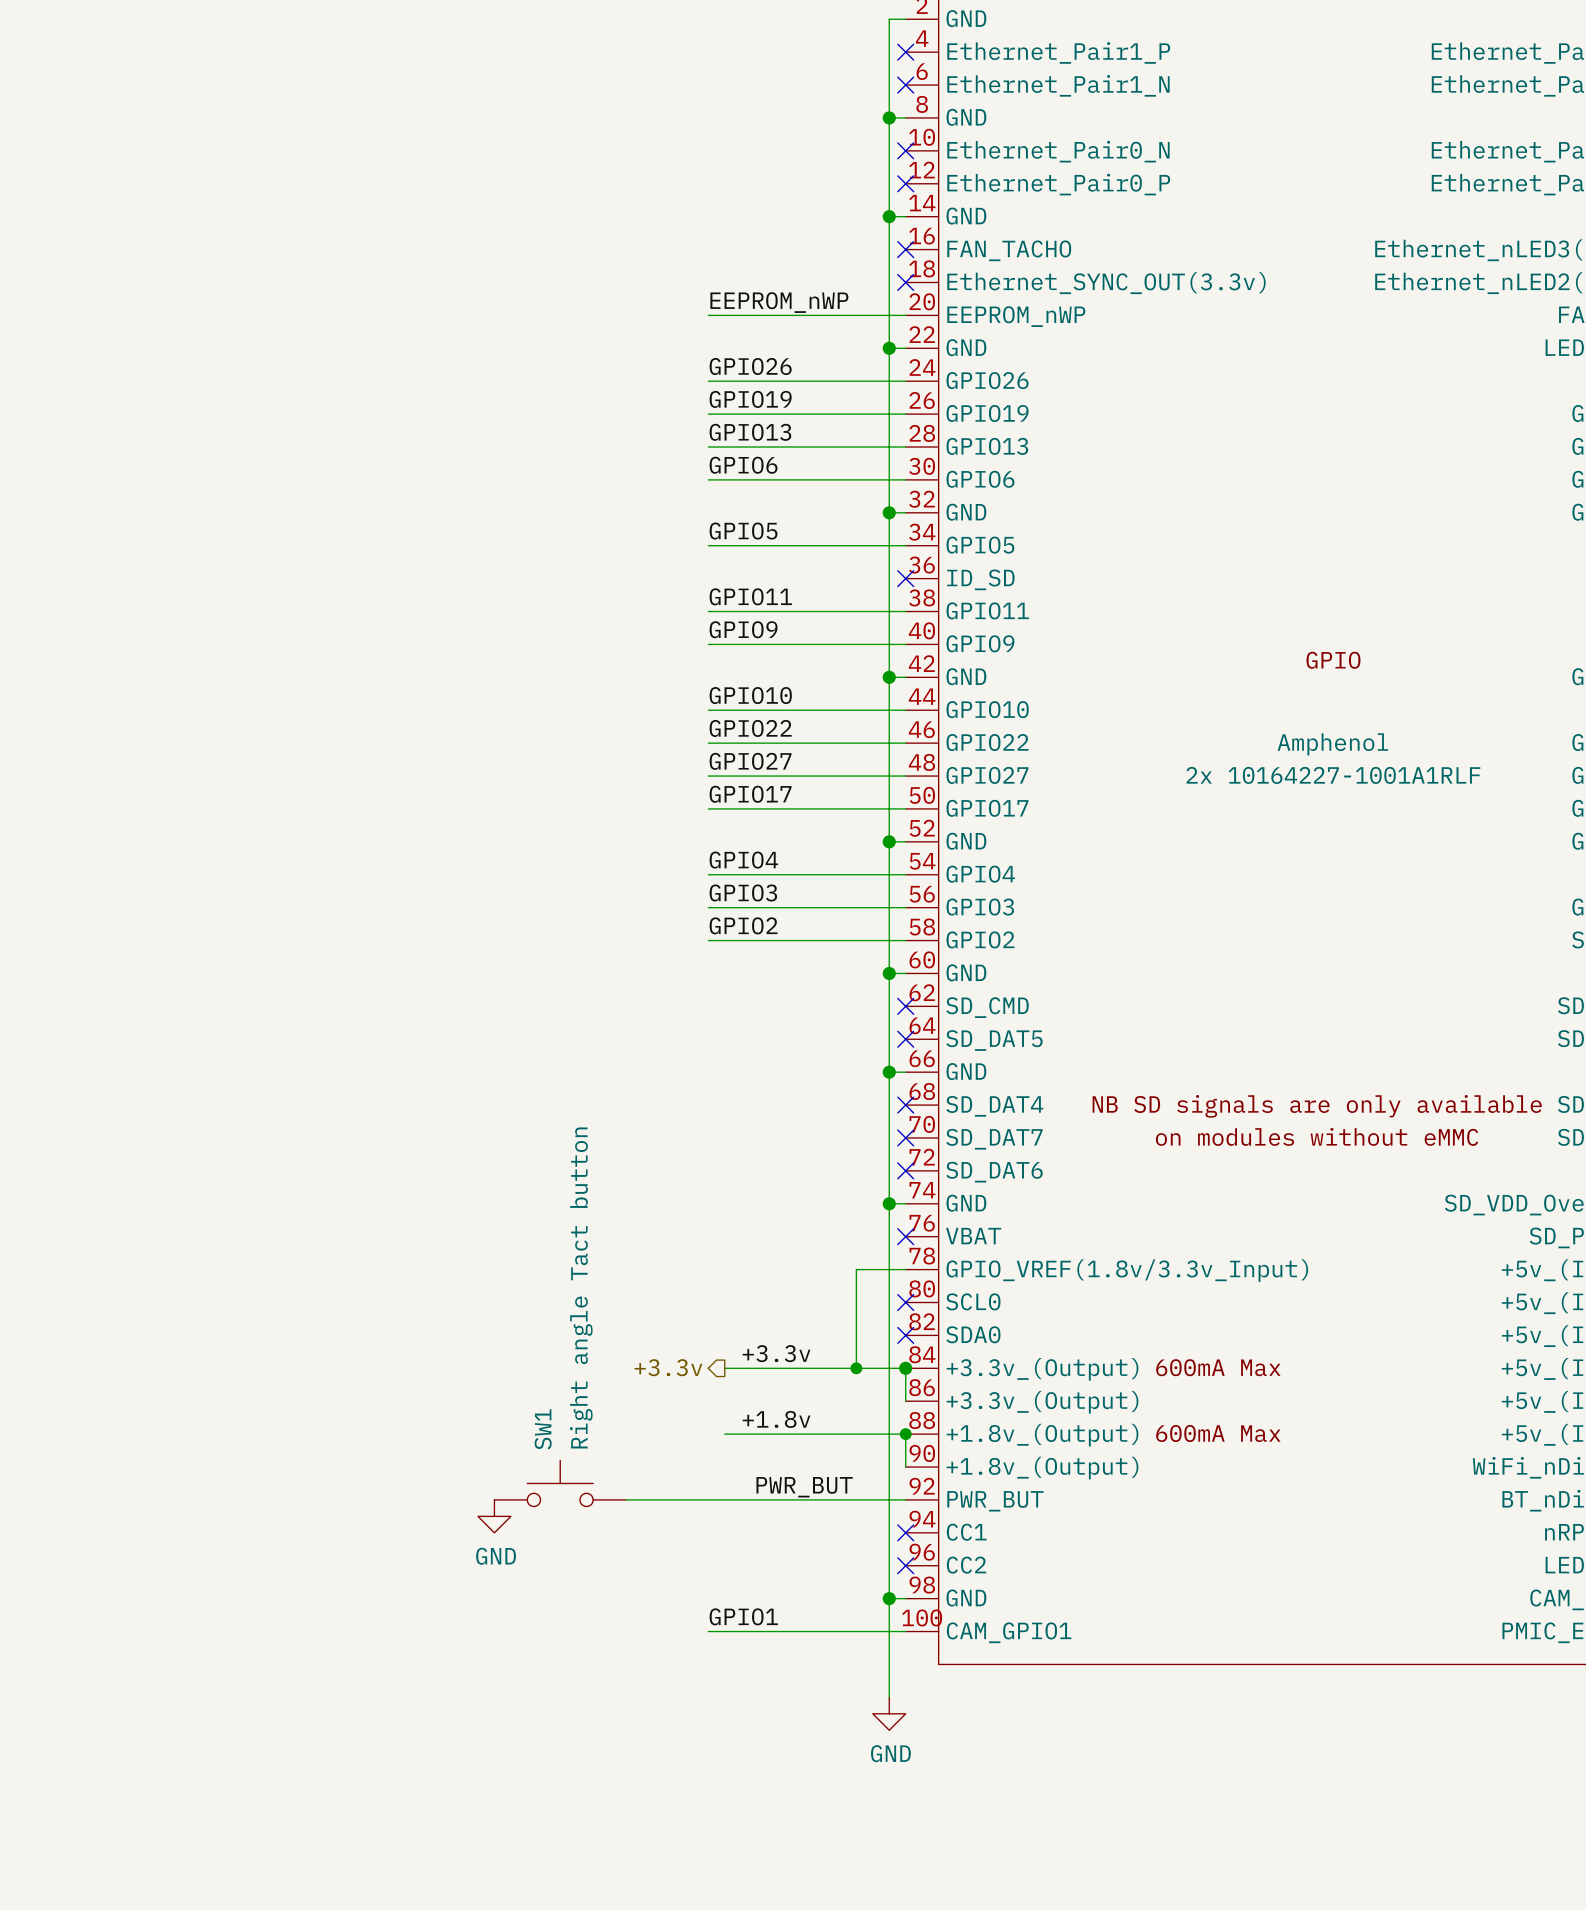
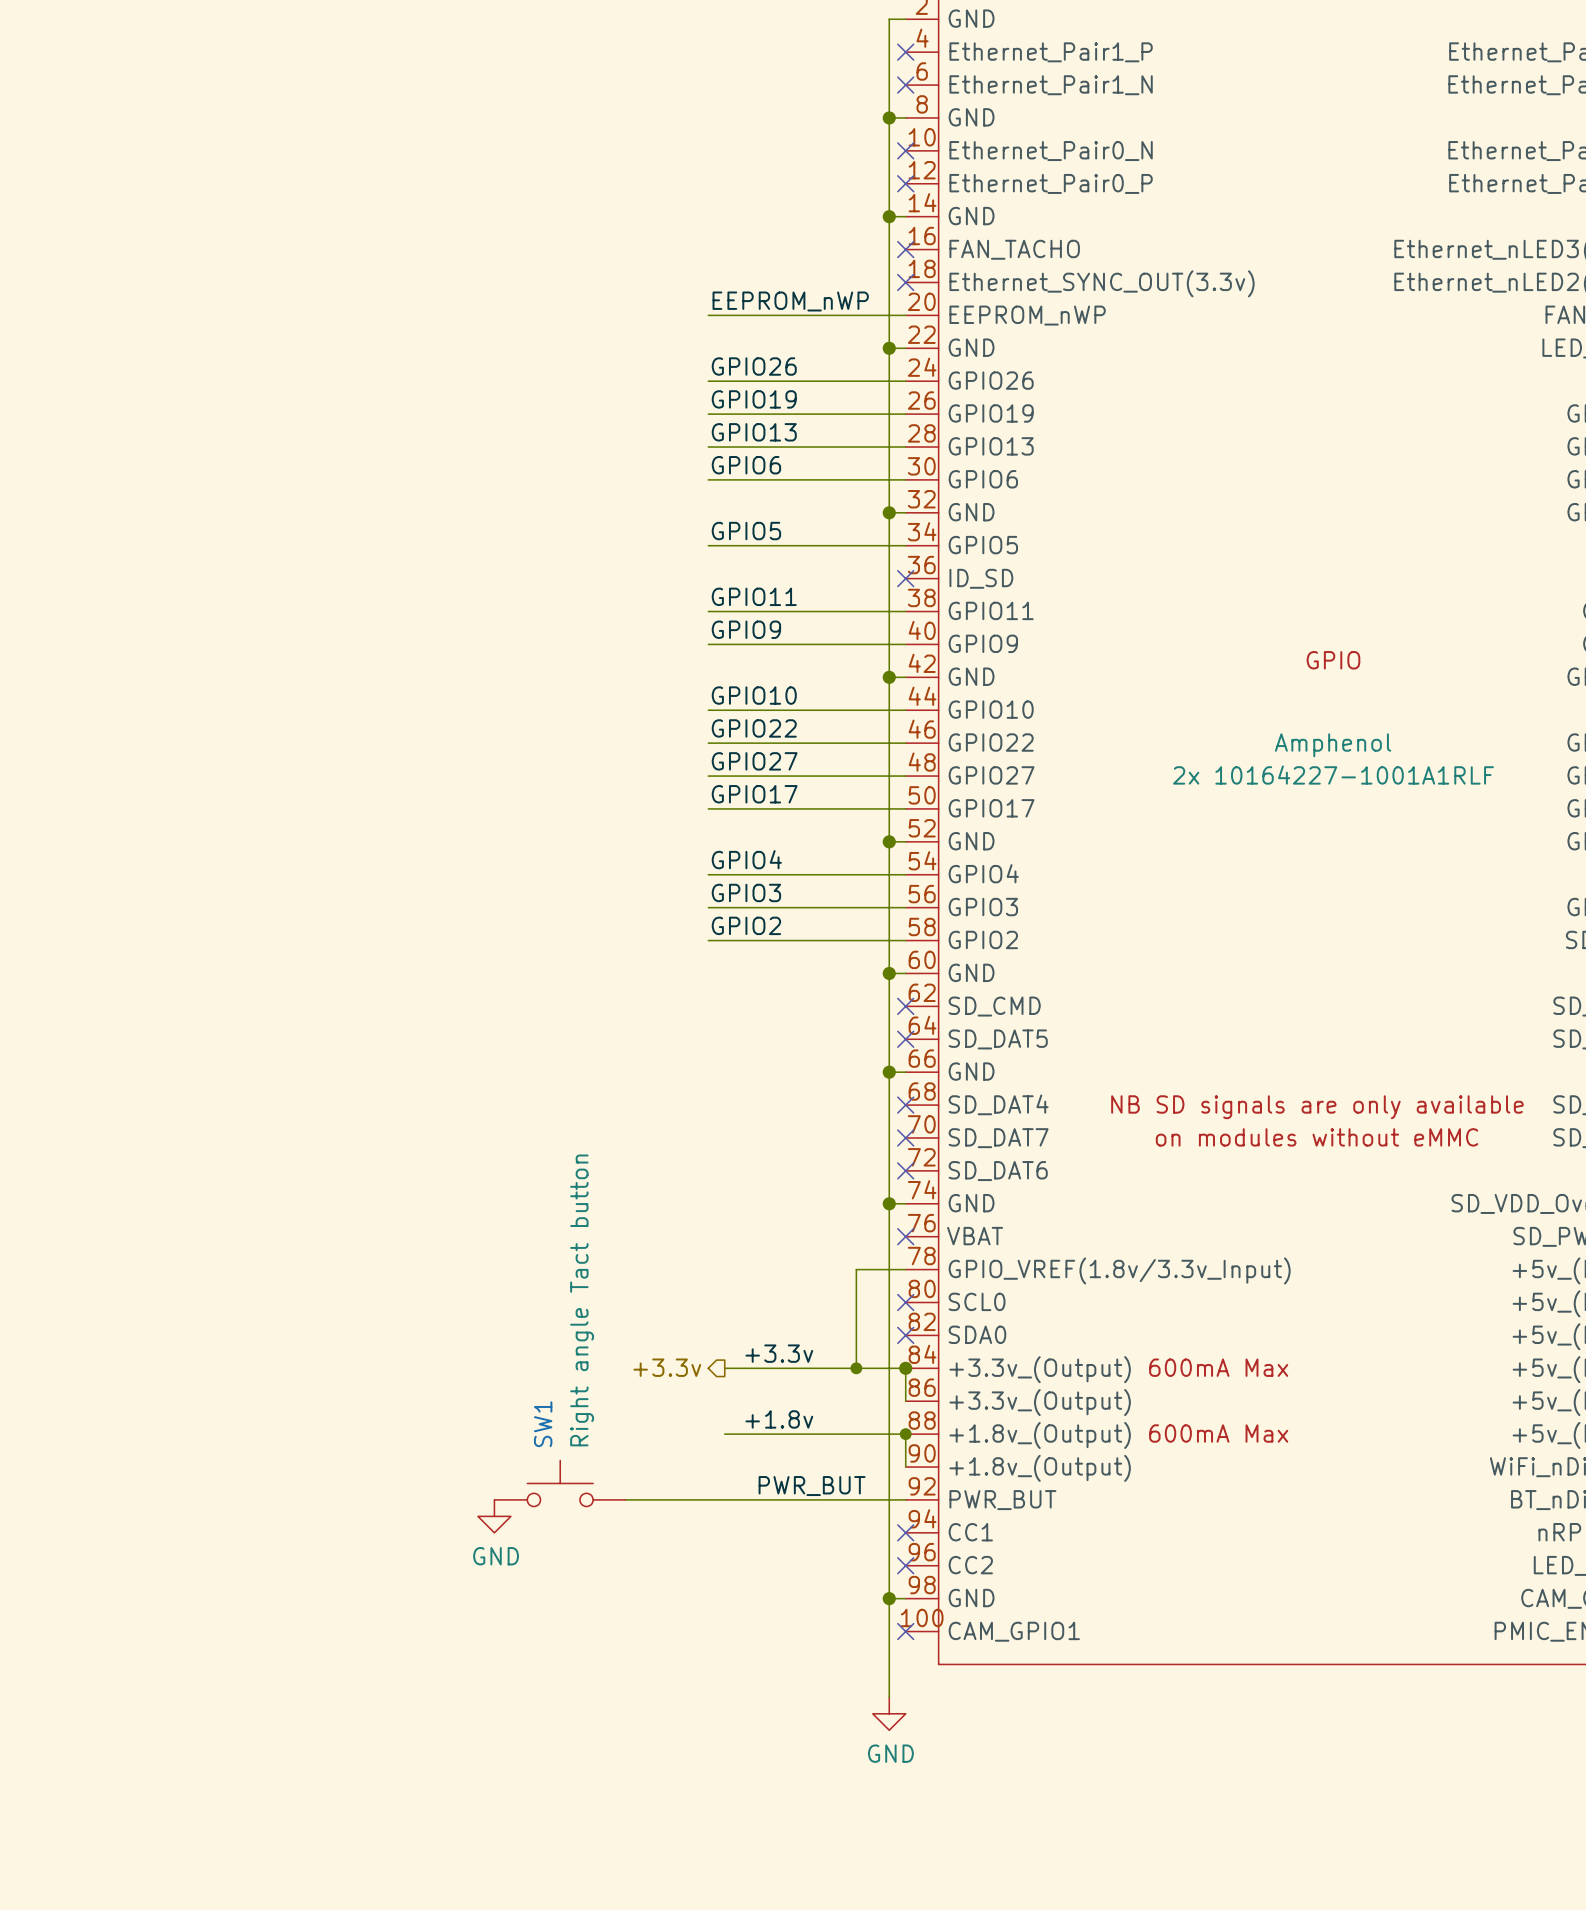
label: GPIO1 (743, 1616) -> none
wire: (708, 1631) (905, 1631) -> none
no-connect mark: none -> (905, 1631)

